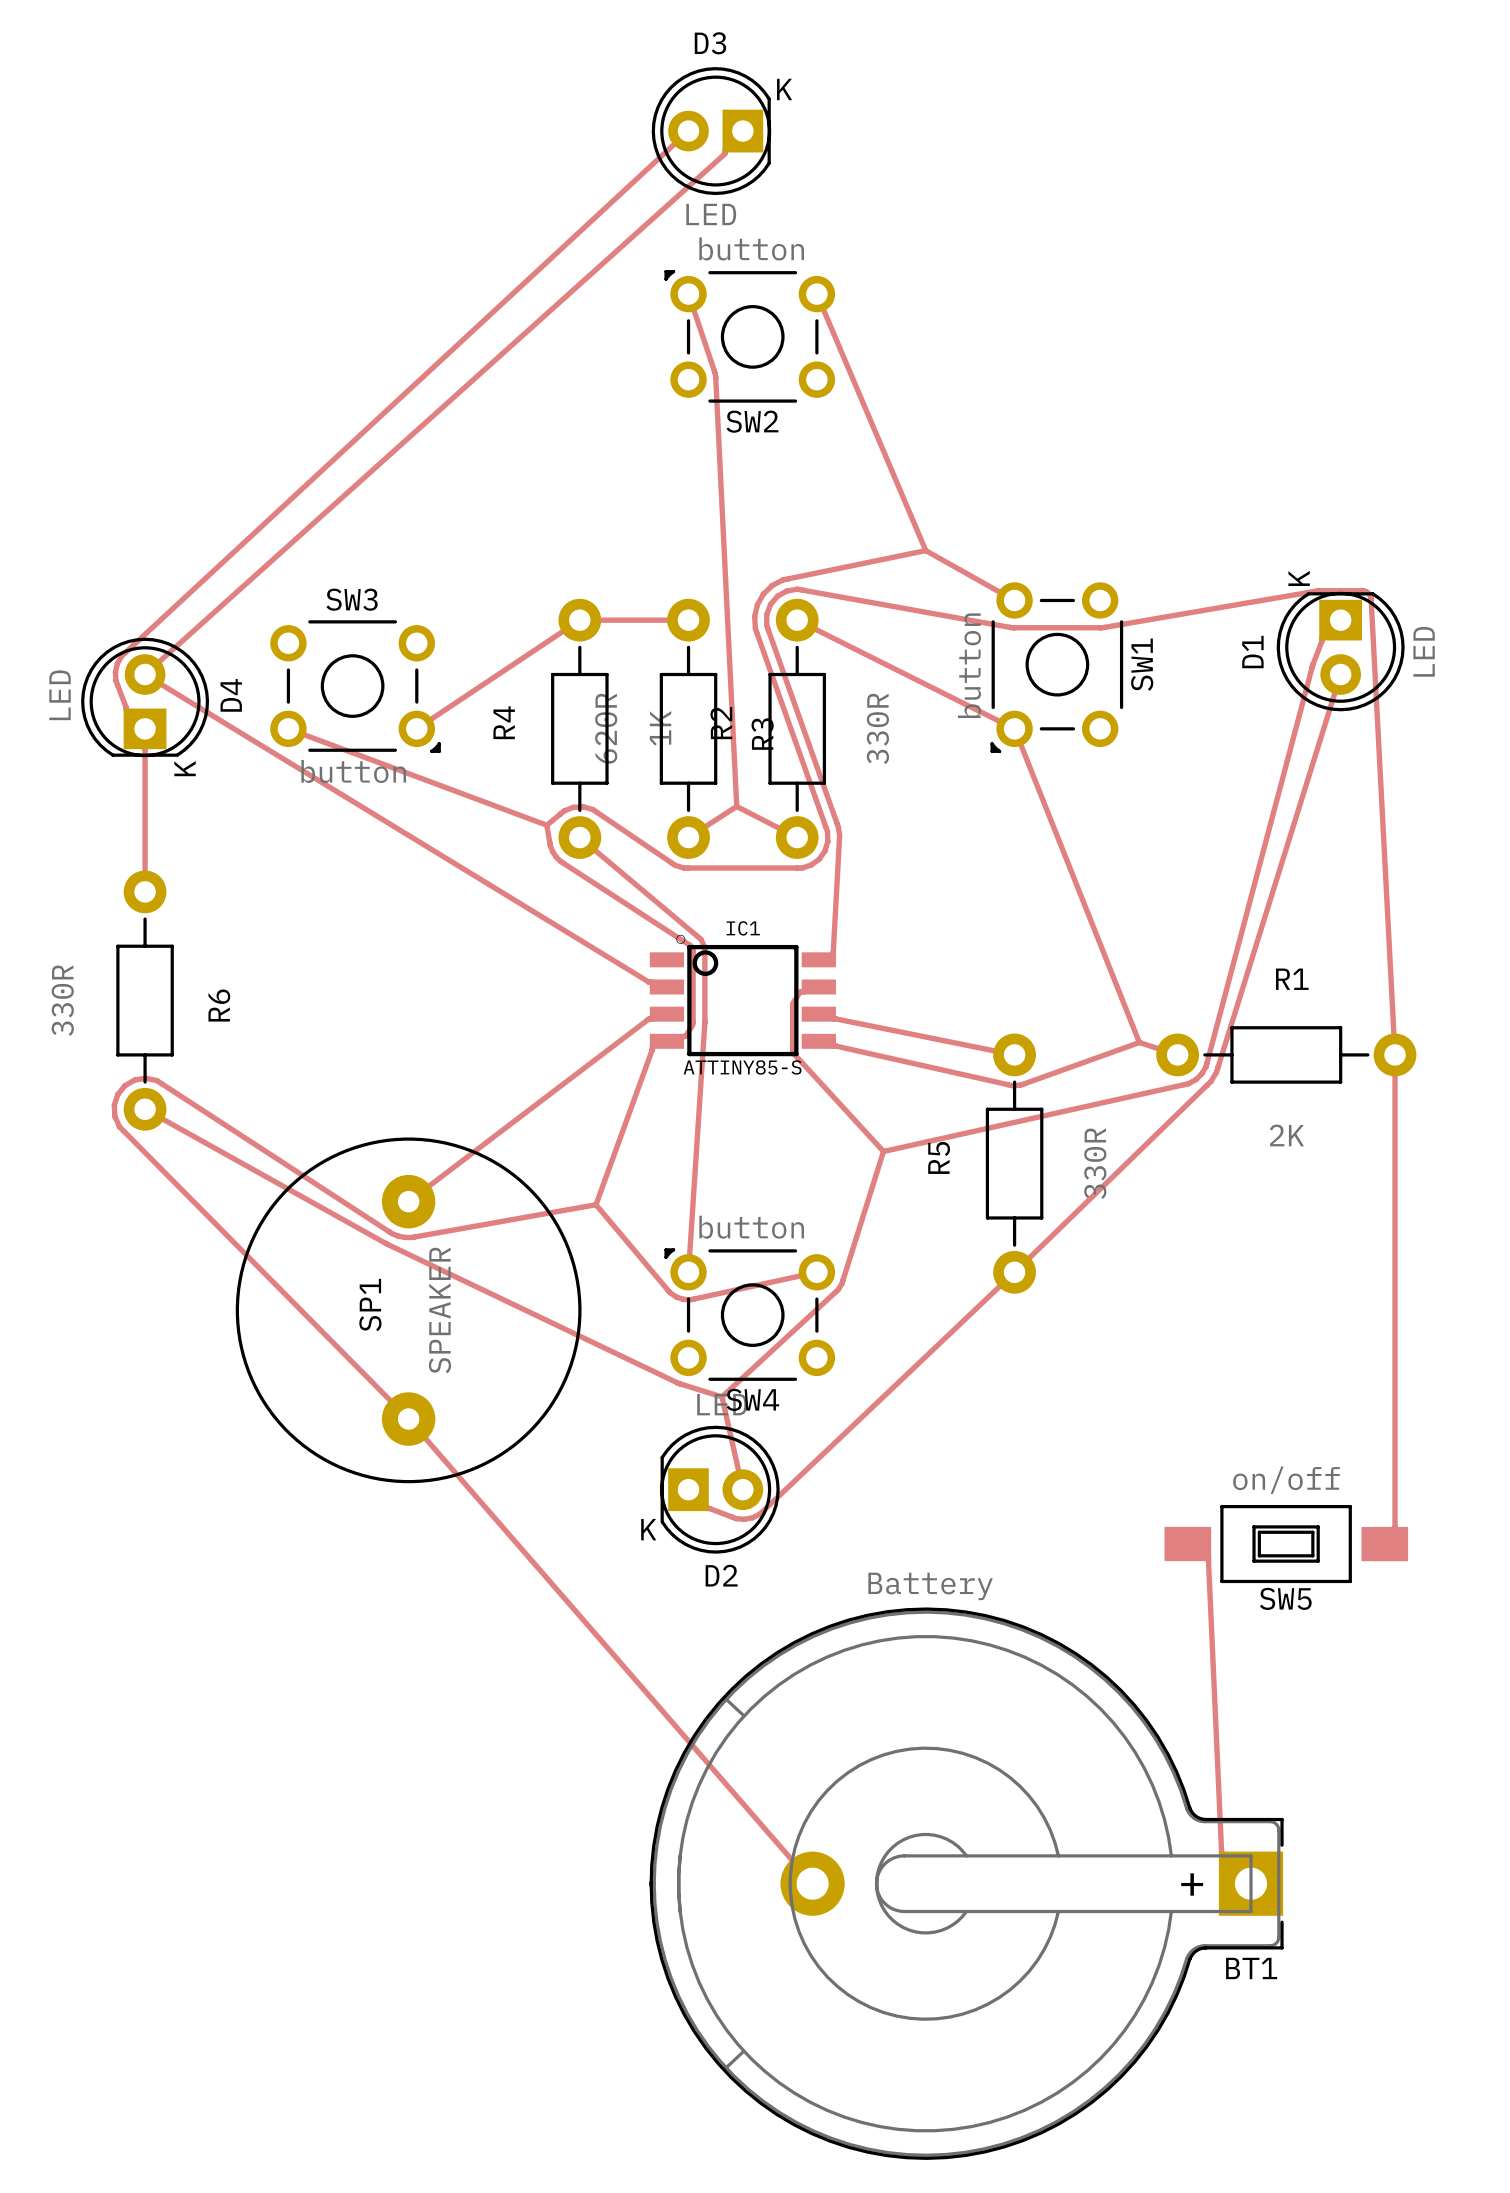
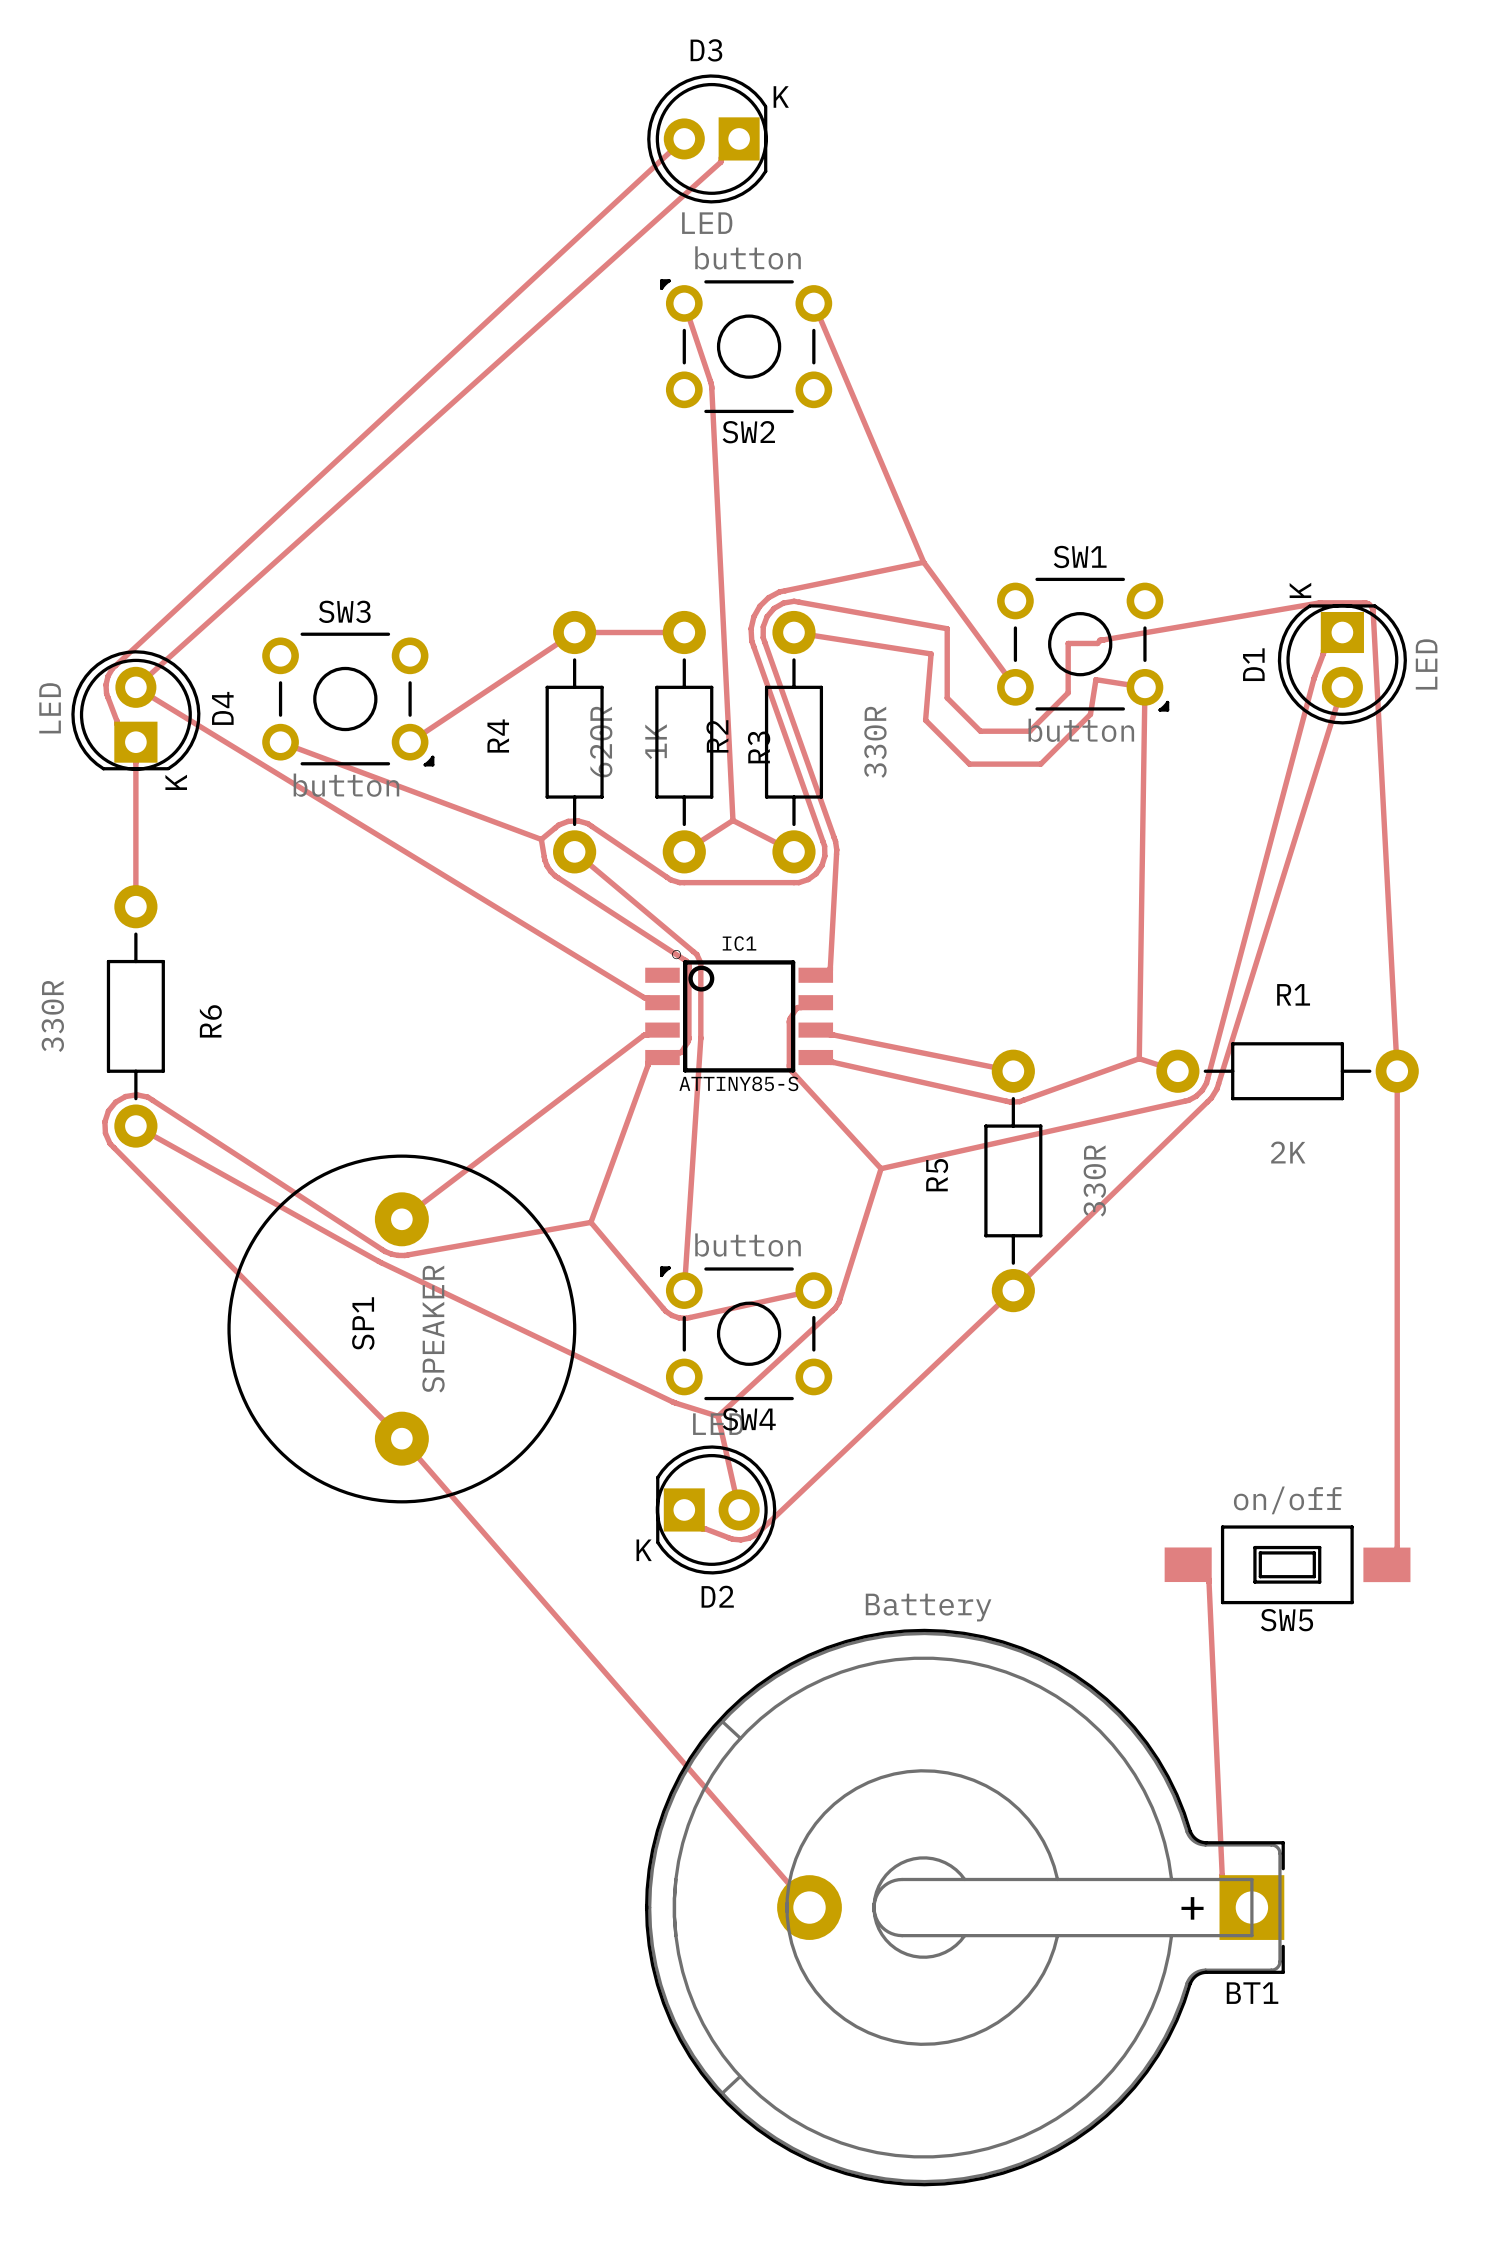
track: (925, 550) (1014, 600) -> (923, 562) (1015, 687)
track: (949, 616) (1013, 627) (1100, 627) -> (947, 628) (947, 698) (980, 731) (1029, 731) (1068, 692) (1068, 643) (1097, 643) (1100, 640)
track: (797, 620) (1014, 728) (1139, 1042) -> (793, 632) (931, 653) (925, 720) (969, 764) (1040, 764) (1090, 714) (1095, 679) (1144, 687) (1139, 1058)
SW1 rotation: 0° (1056, 667) -> 90° counterclockwise (1083, 644)

